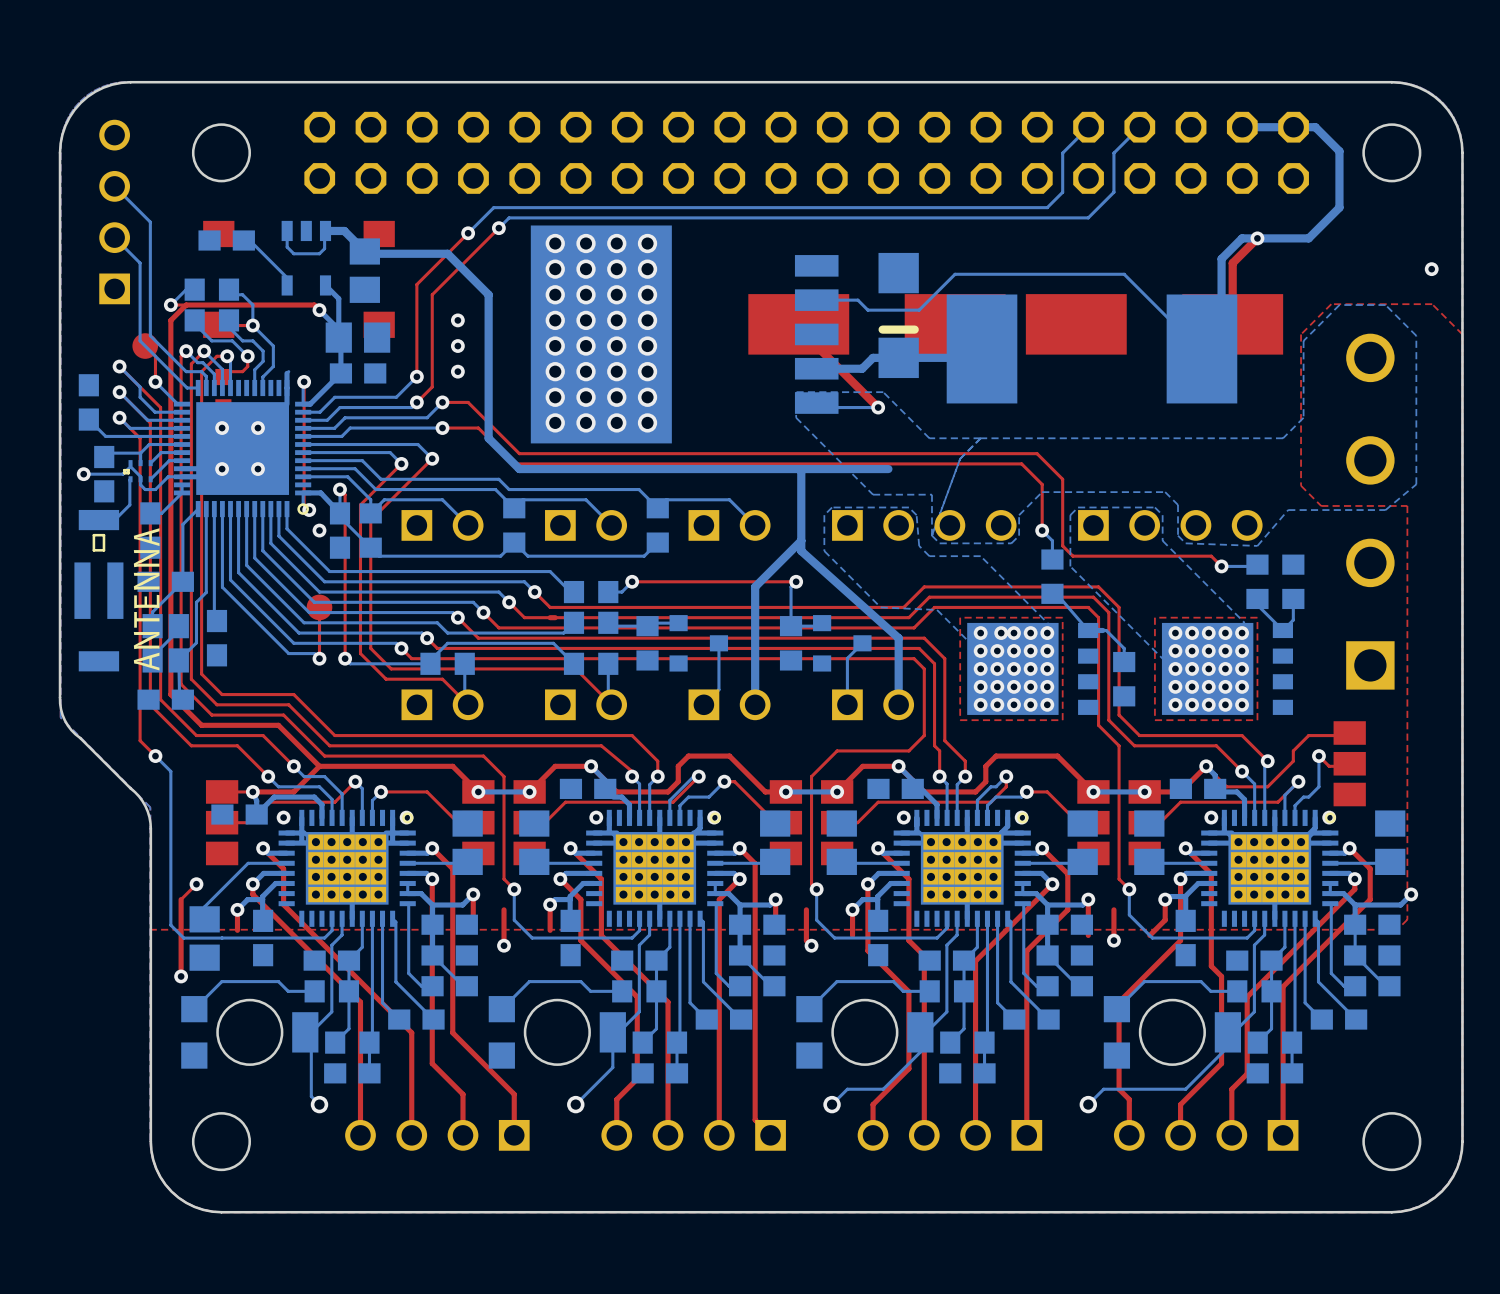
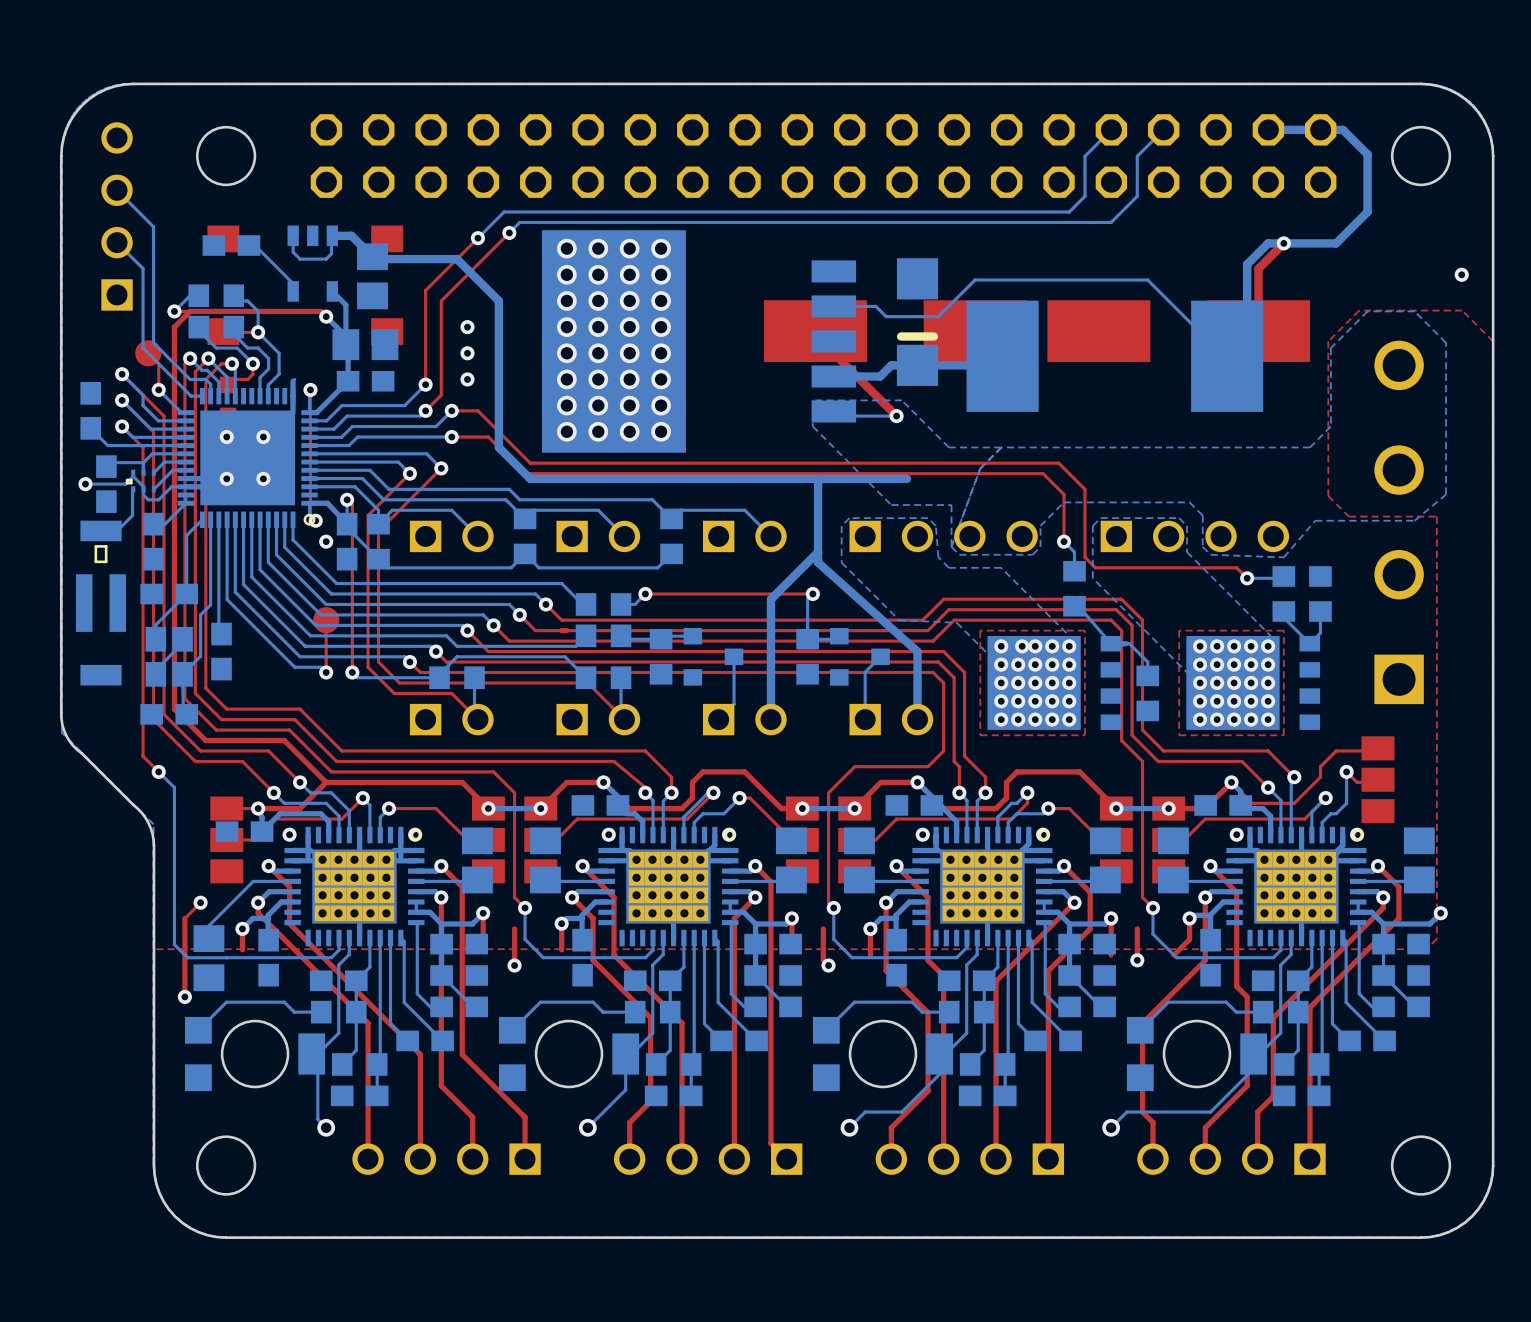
part value: ANTENNA (146, 599) -> none

